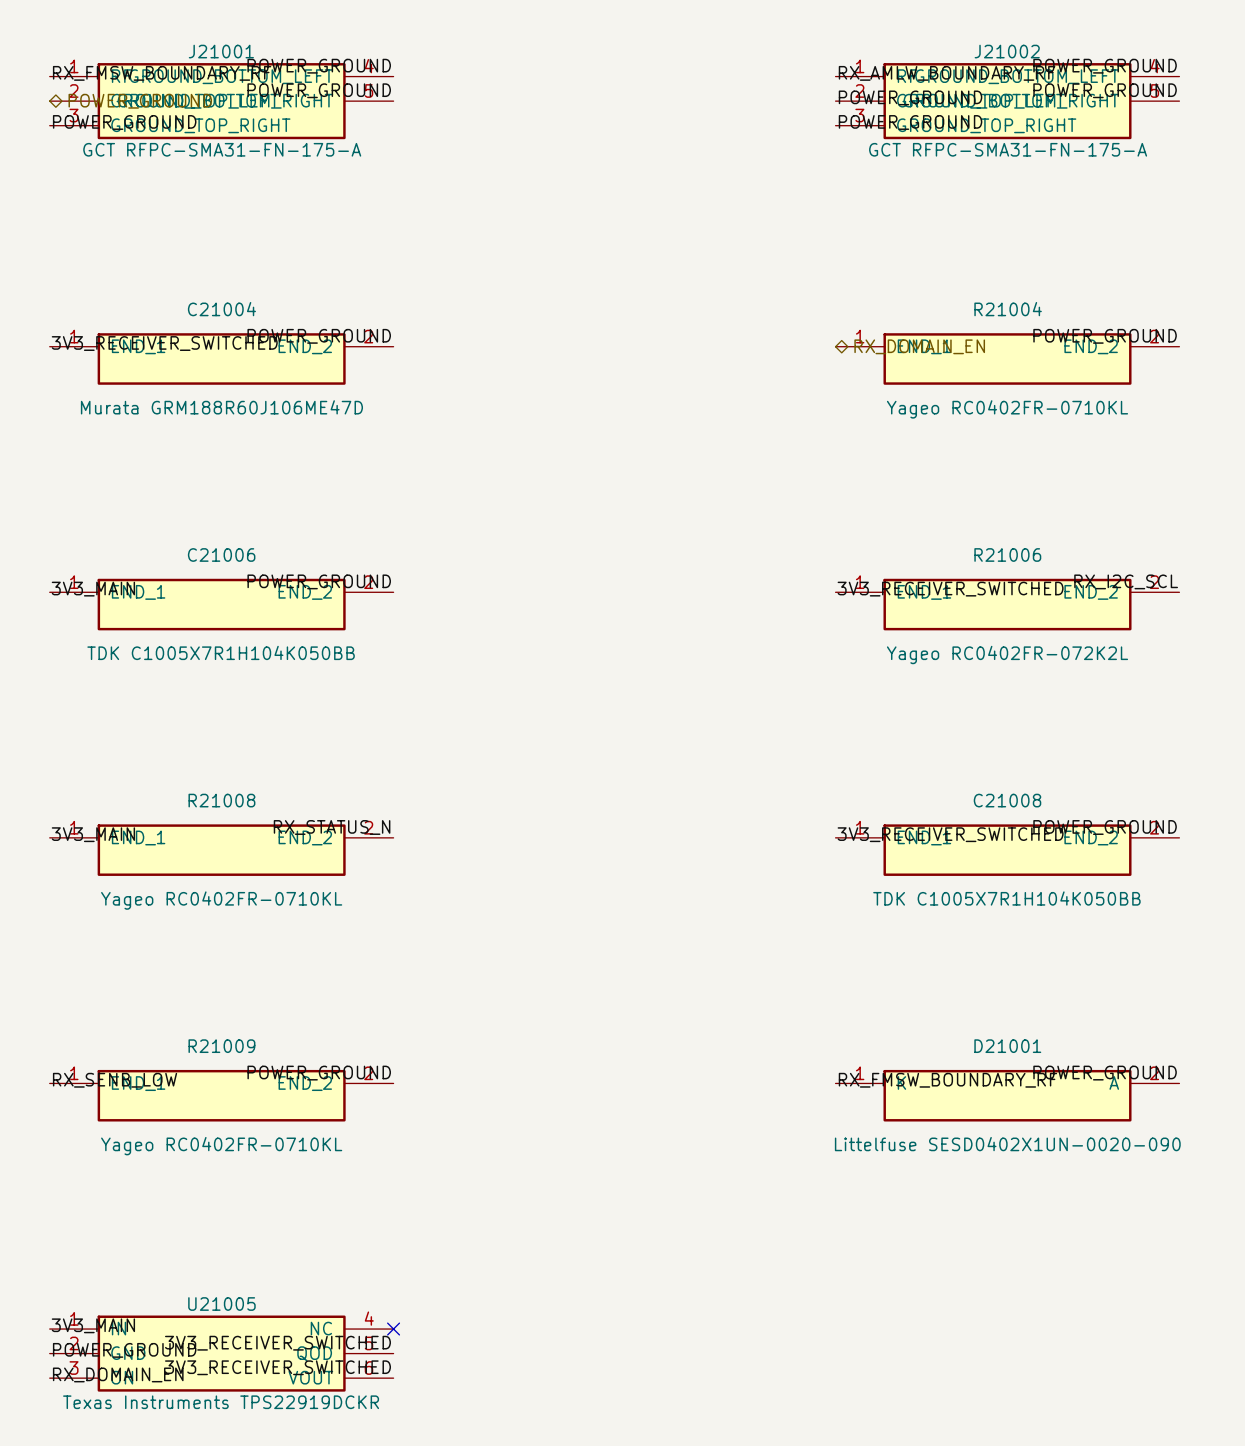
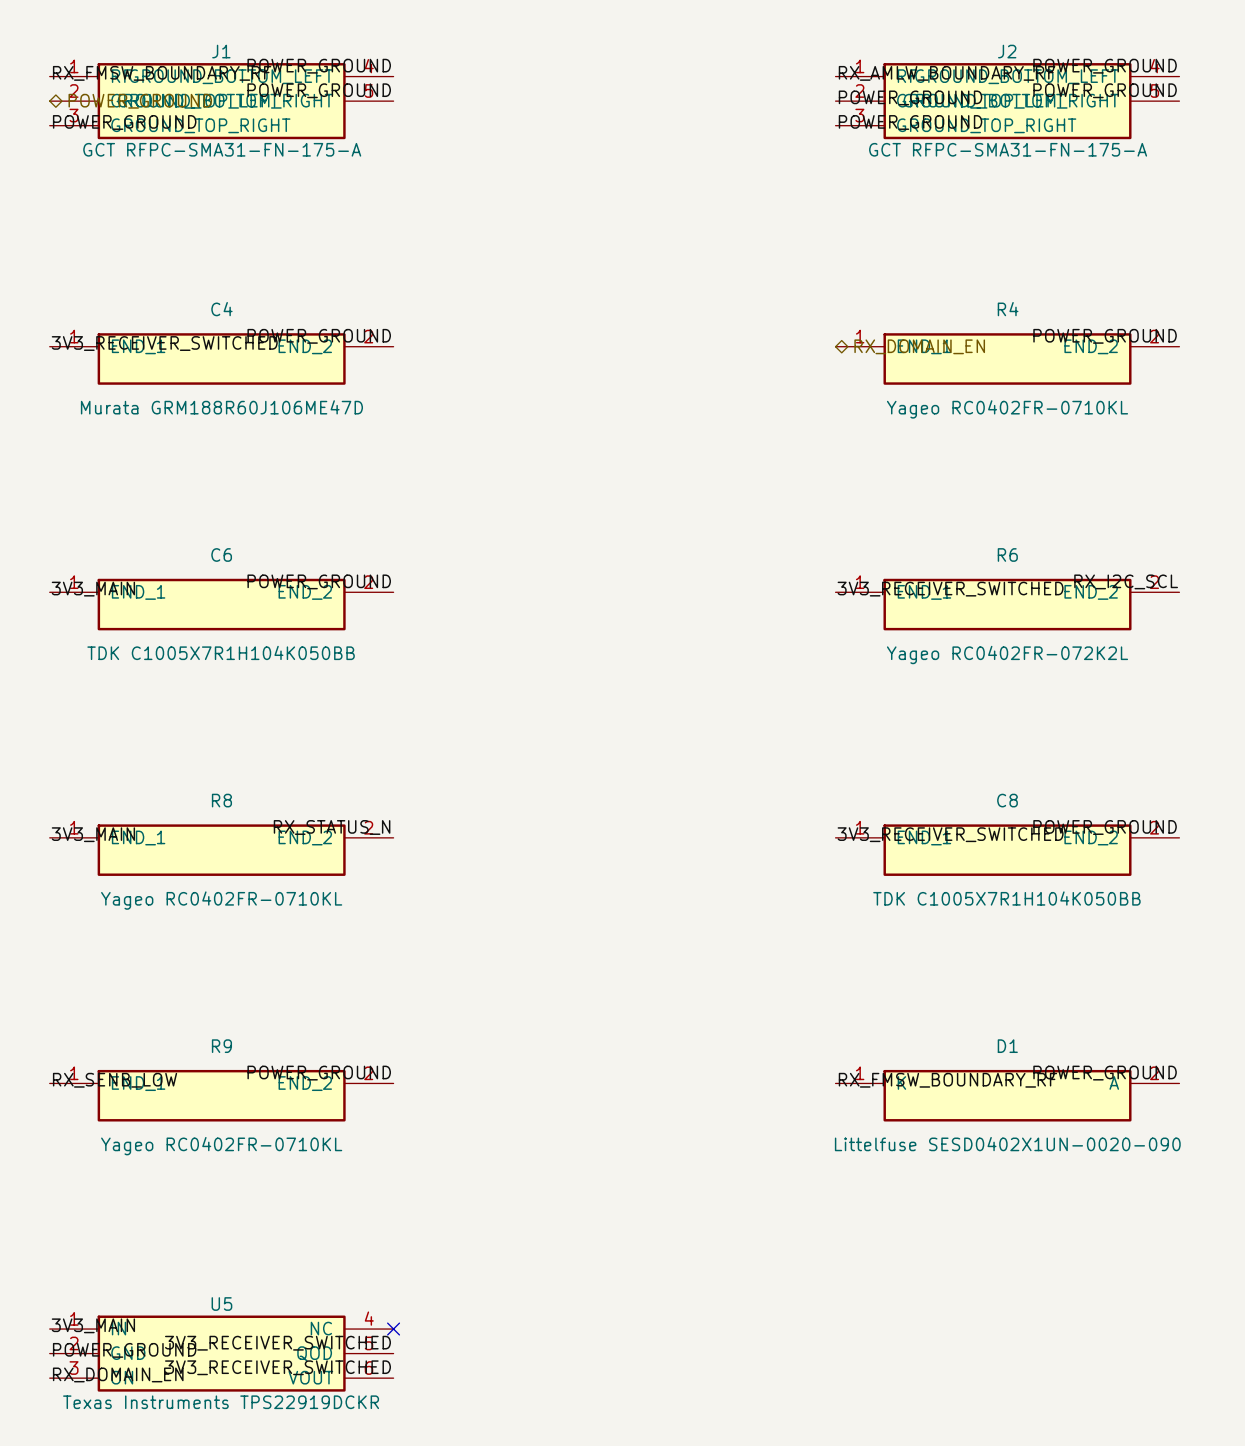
J21001 name: J21001 (221, 51) -> J1 (221, 51)
J21002 name: J21002 (1007, 51) -> J2 (1007, 51)
C21004 name: C21004 (221, 309) -> C4 (221, 309)
R21004 name: R21004 (1008, 309) -> R4 (1008, 309)
C21006 name: C21006 (221, 554) -> C6 (221, 554)
R21006 name: R21006 (1007, 554) -> R6 (1007, 554)
R21008 name: R21008 (221, 800) -> R8 (221, 800)
C21008 name: C21008 (1007, 800) -> C8 (1007, 800)
R21009 name: R21009 (221, 1046) -> R9 (221, 1046)
D21001 name: D21001 (1007, 1046) -> D1 (1007, 1046)
U21005 name: U21005 (221, 1304) -> U5 (221, 1304)

